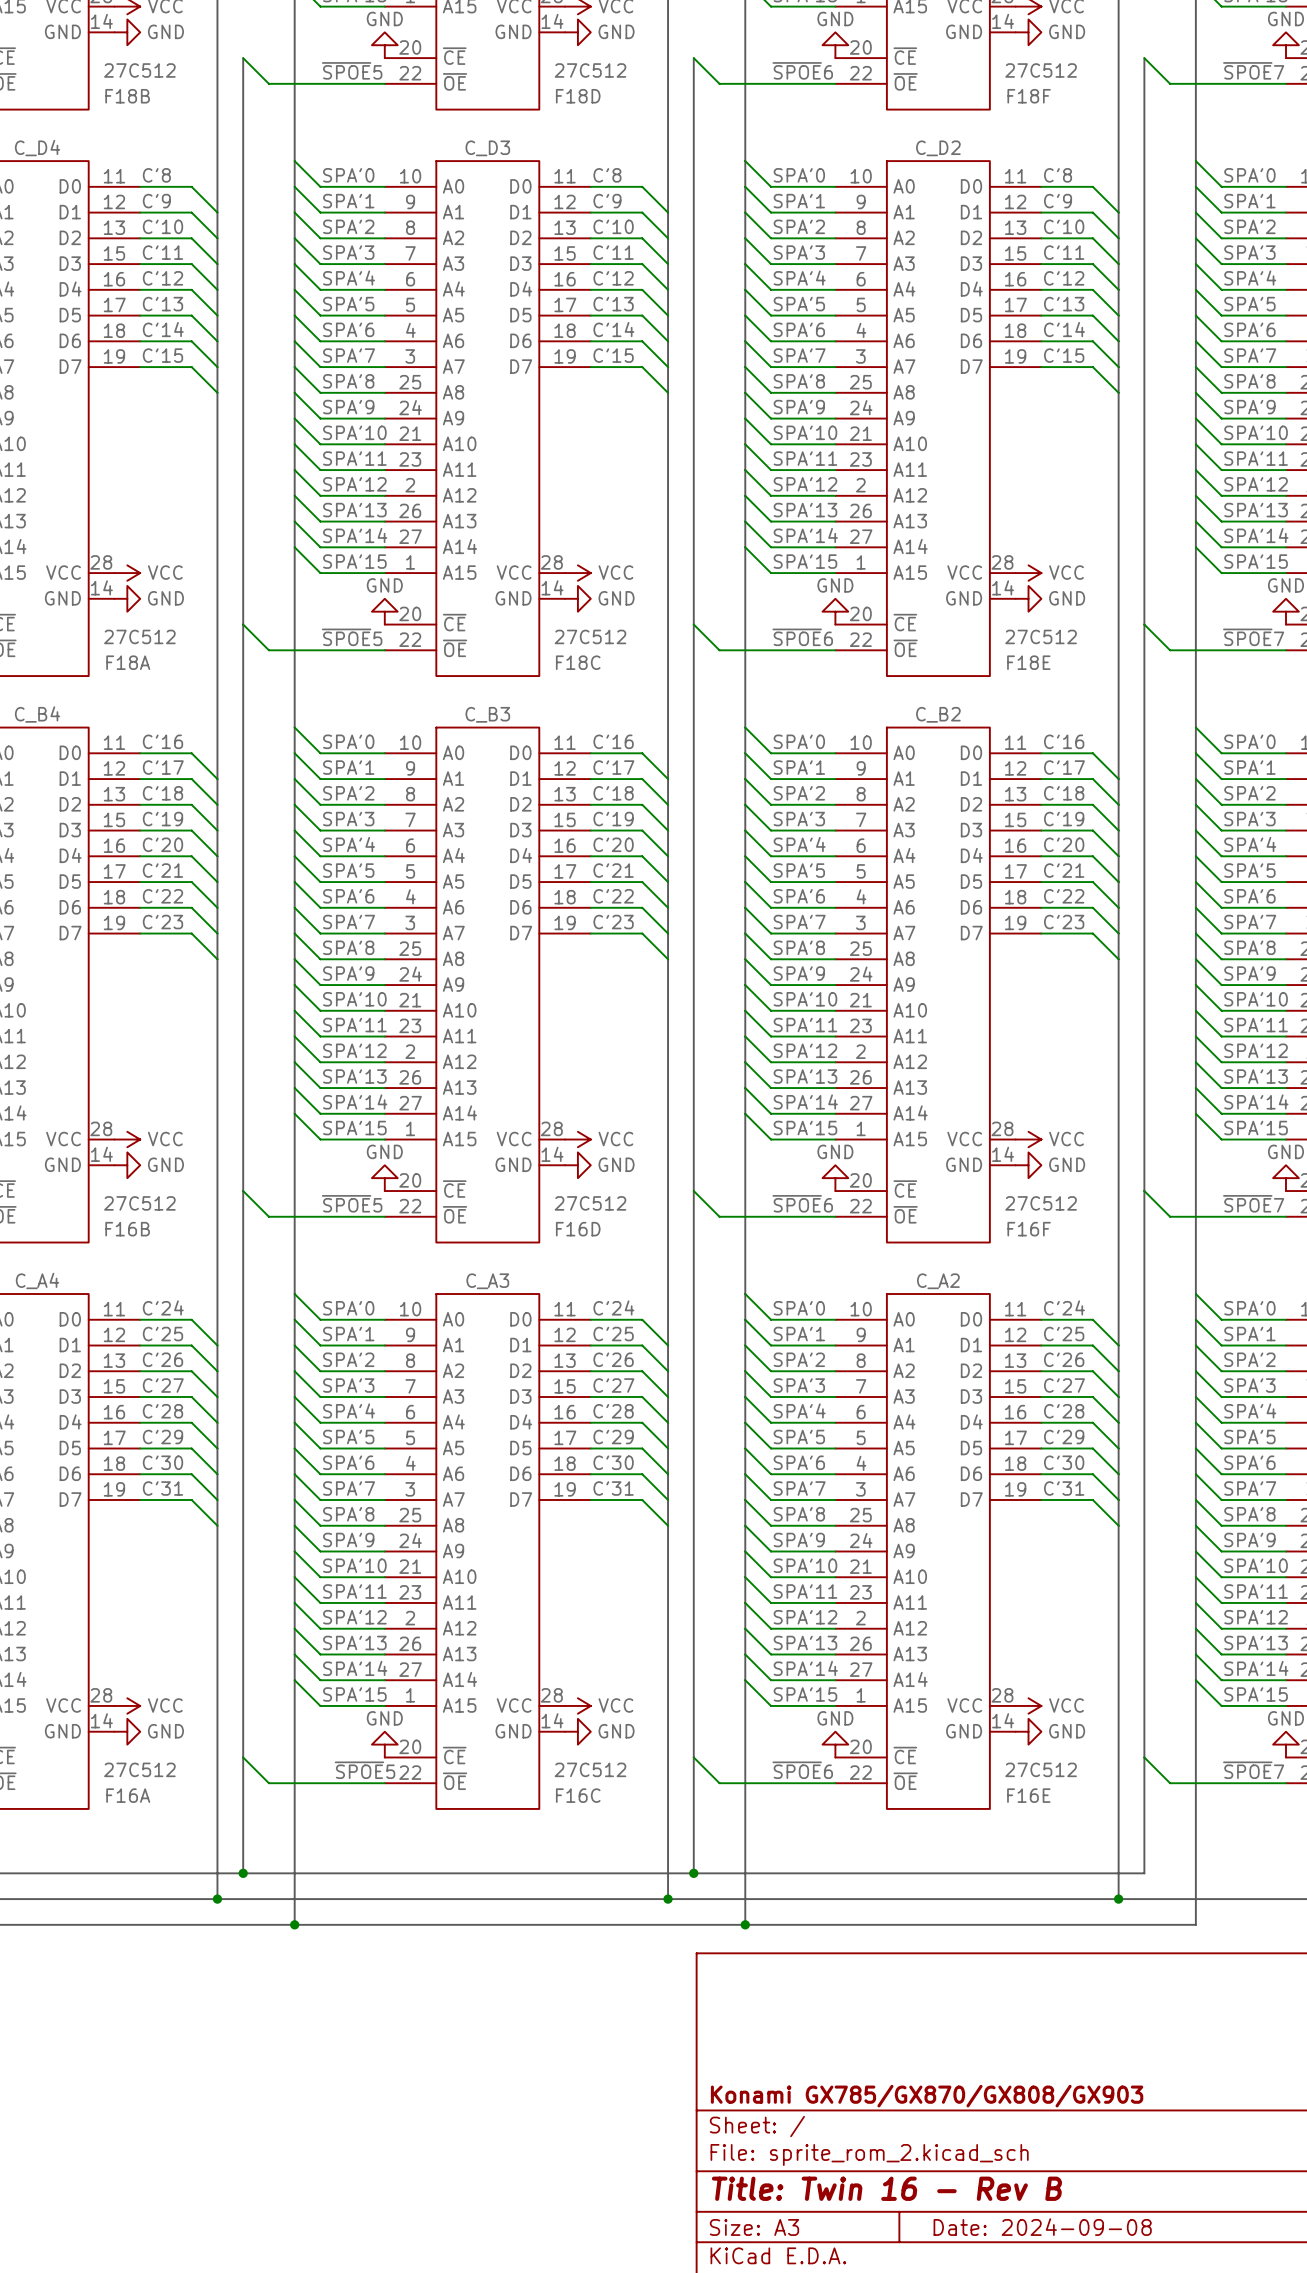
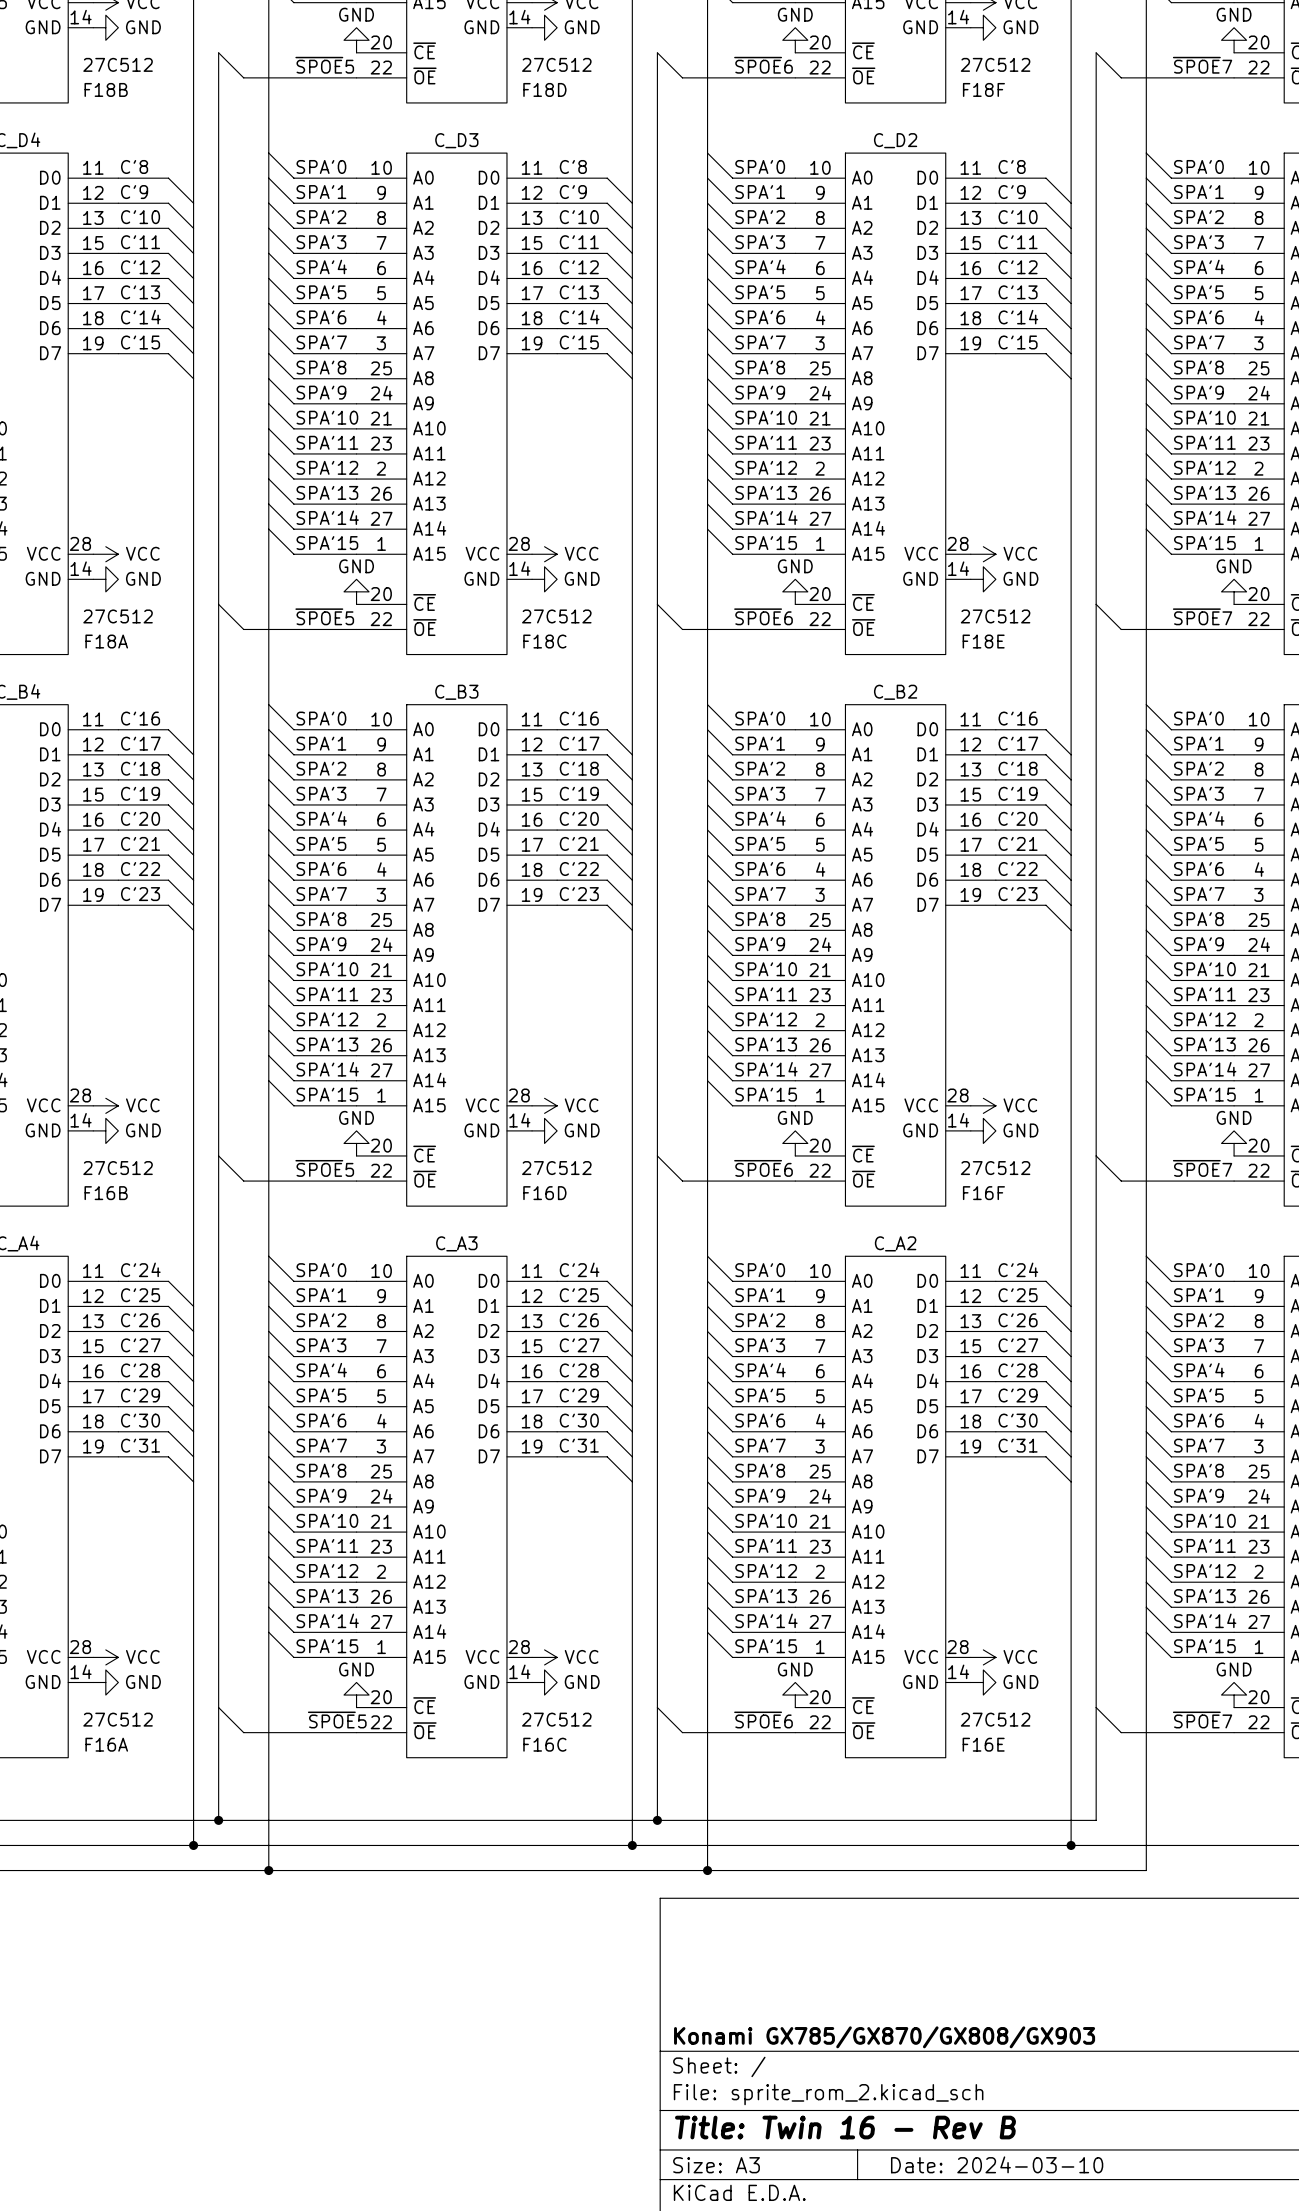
title block: Date: 2024-09-08 (1042, 2227) -> Date: 2024-03-10 (997, 2164)

